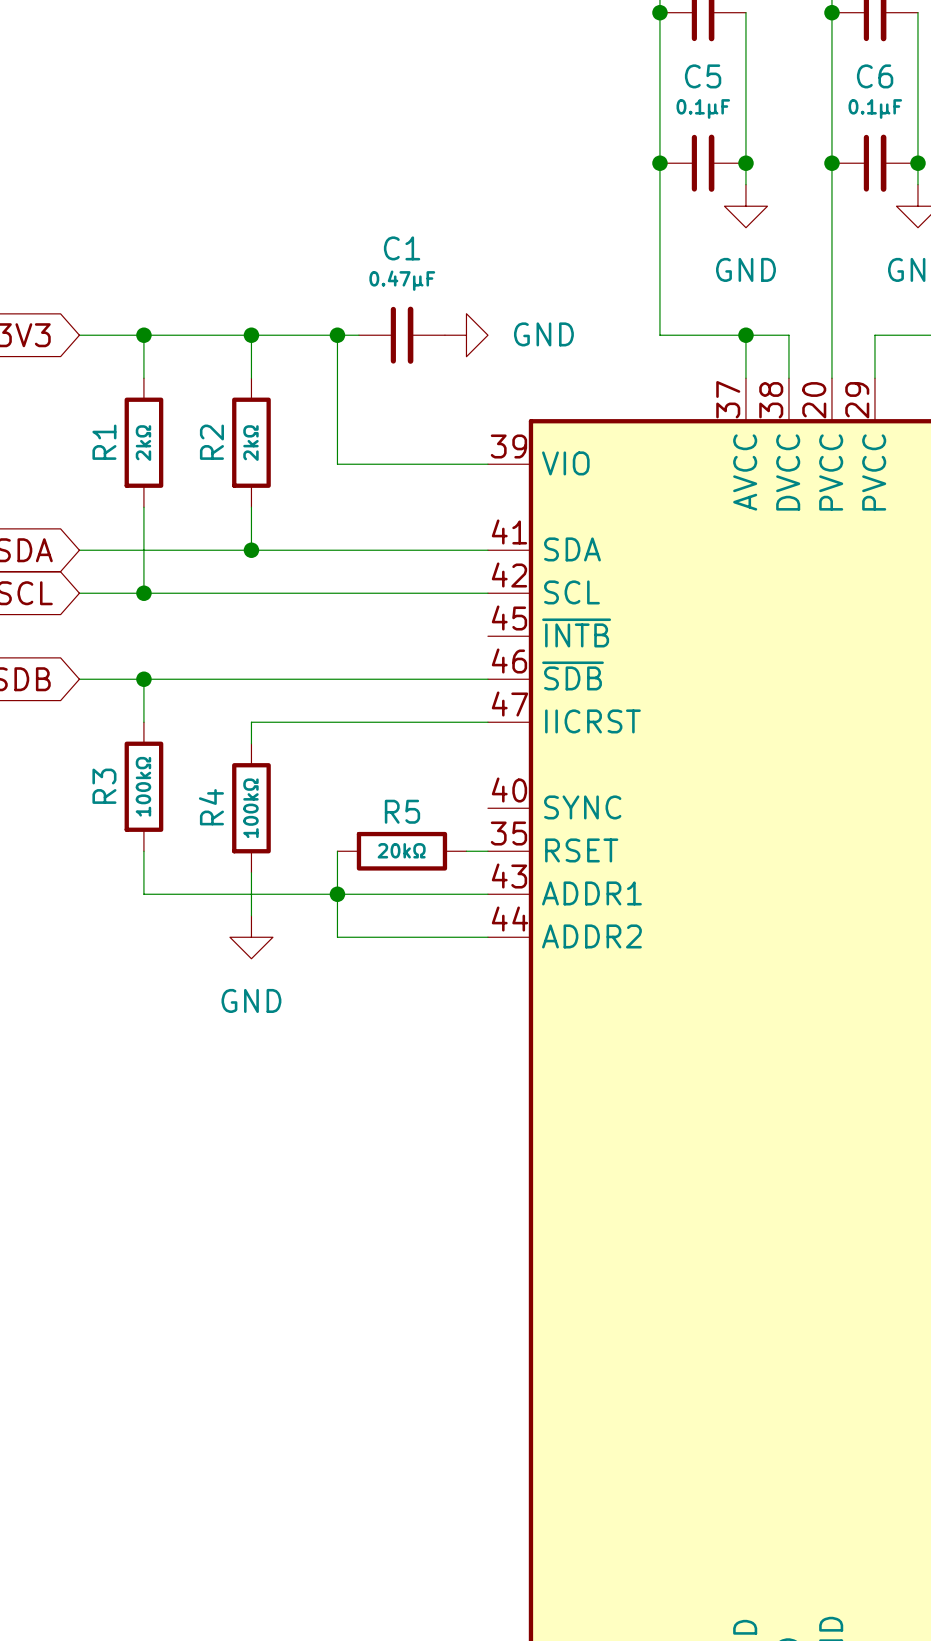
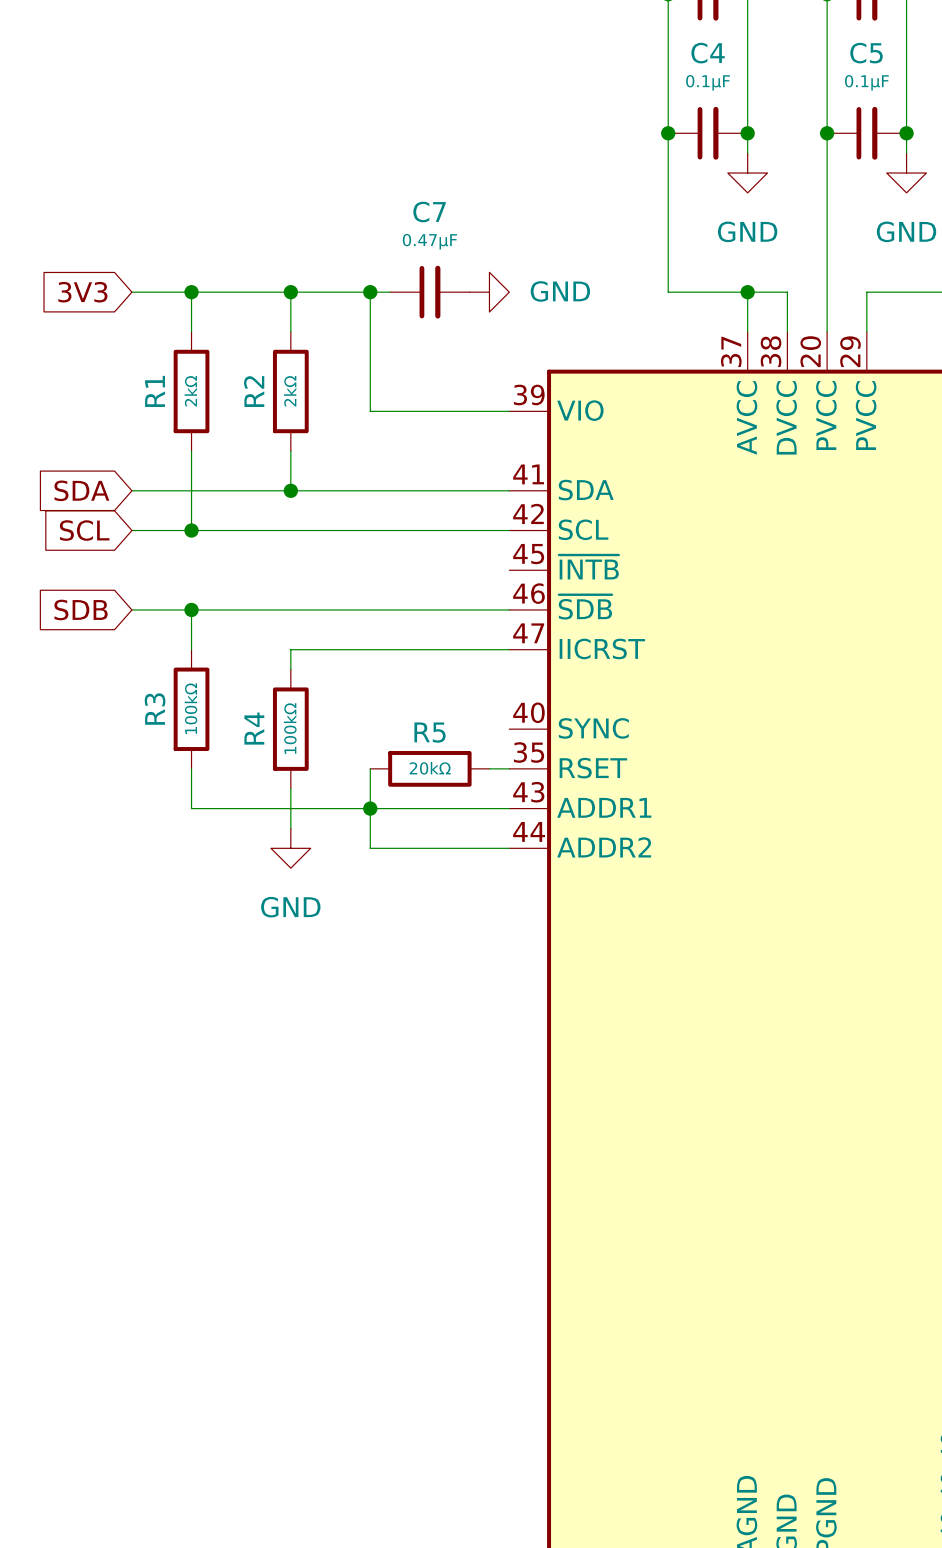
C5 name: C5 (703, 76) -> C4 (708, 53)
C6 name: C6 (875, 76) -> C5 (866, 53)
C1 name: C1 (402, 248) -> C7 (429, 212)

